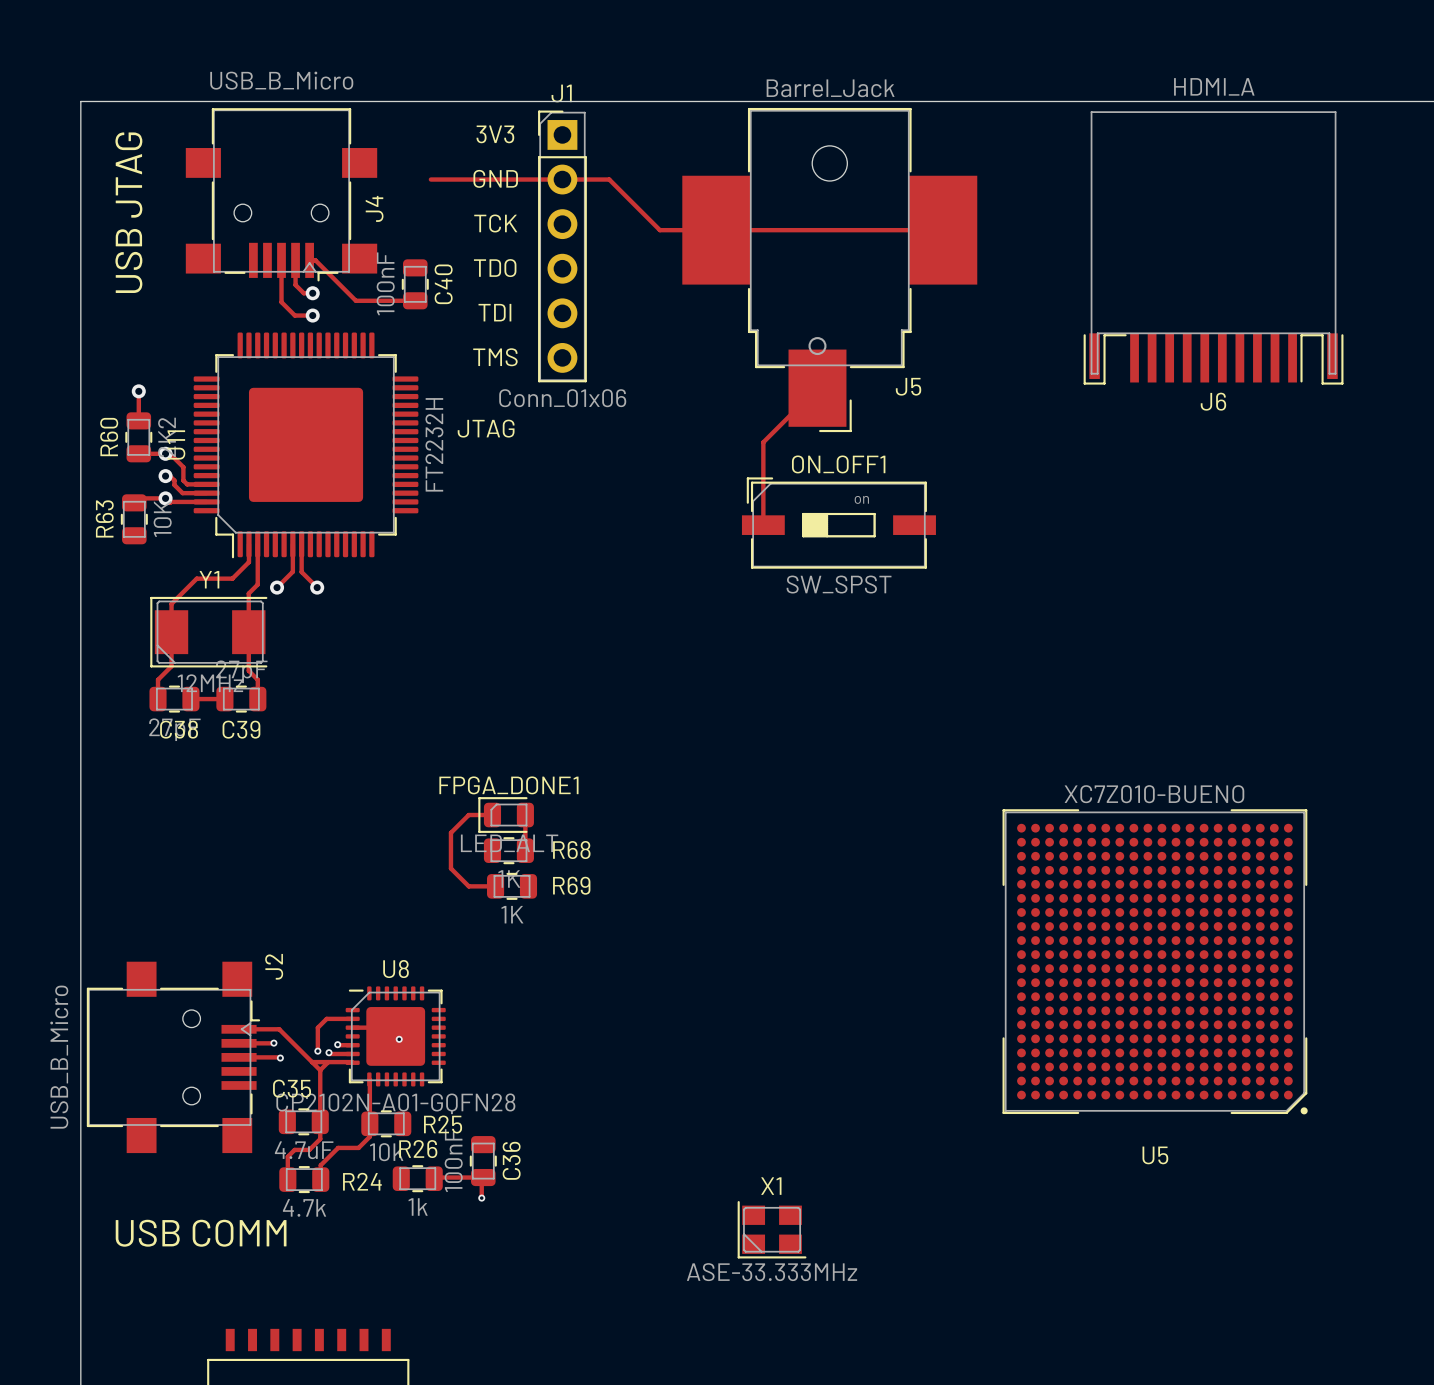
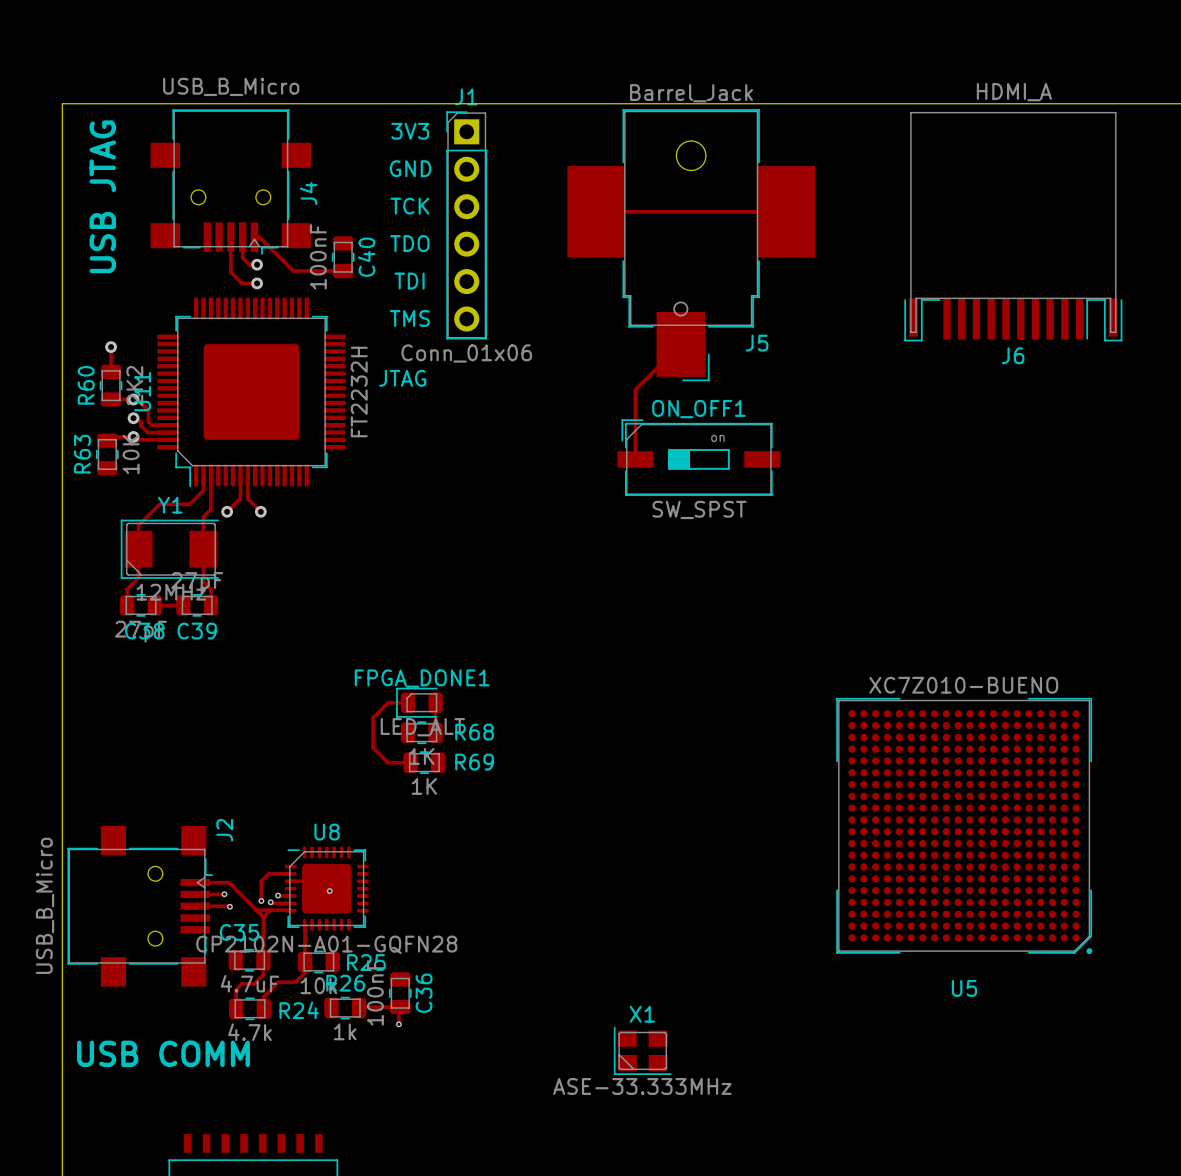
track: (430, 179) (609, 179) (659, 230) (716, 230) -> none

